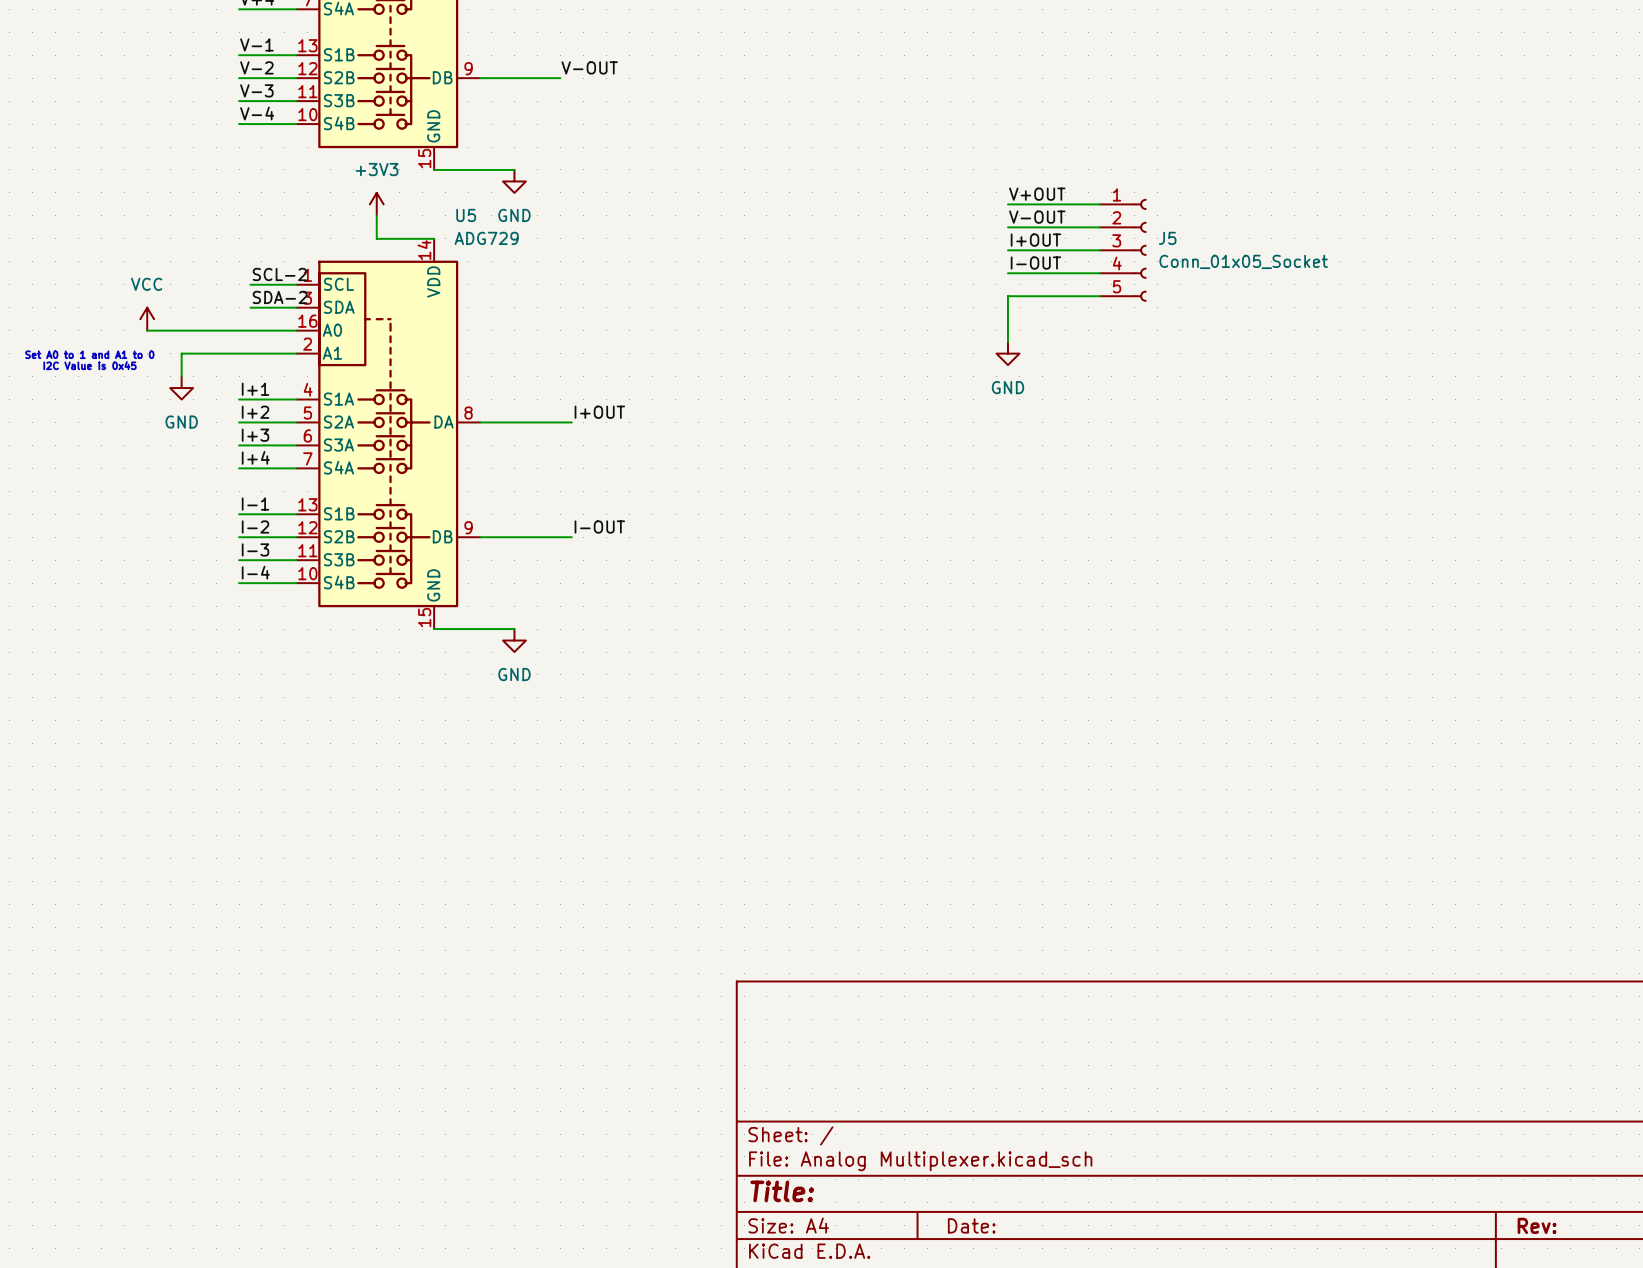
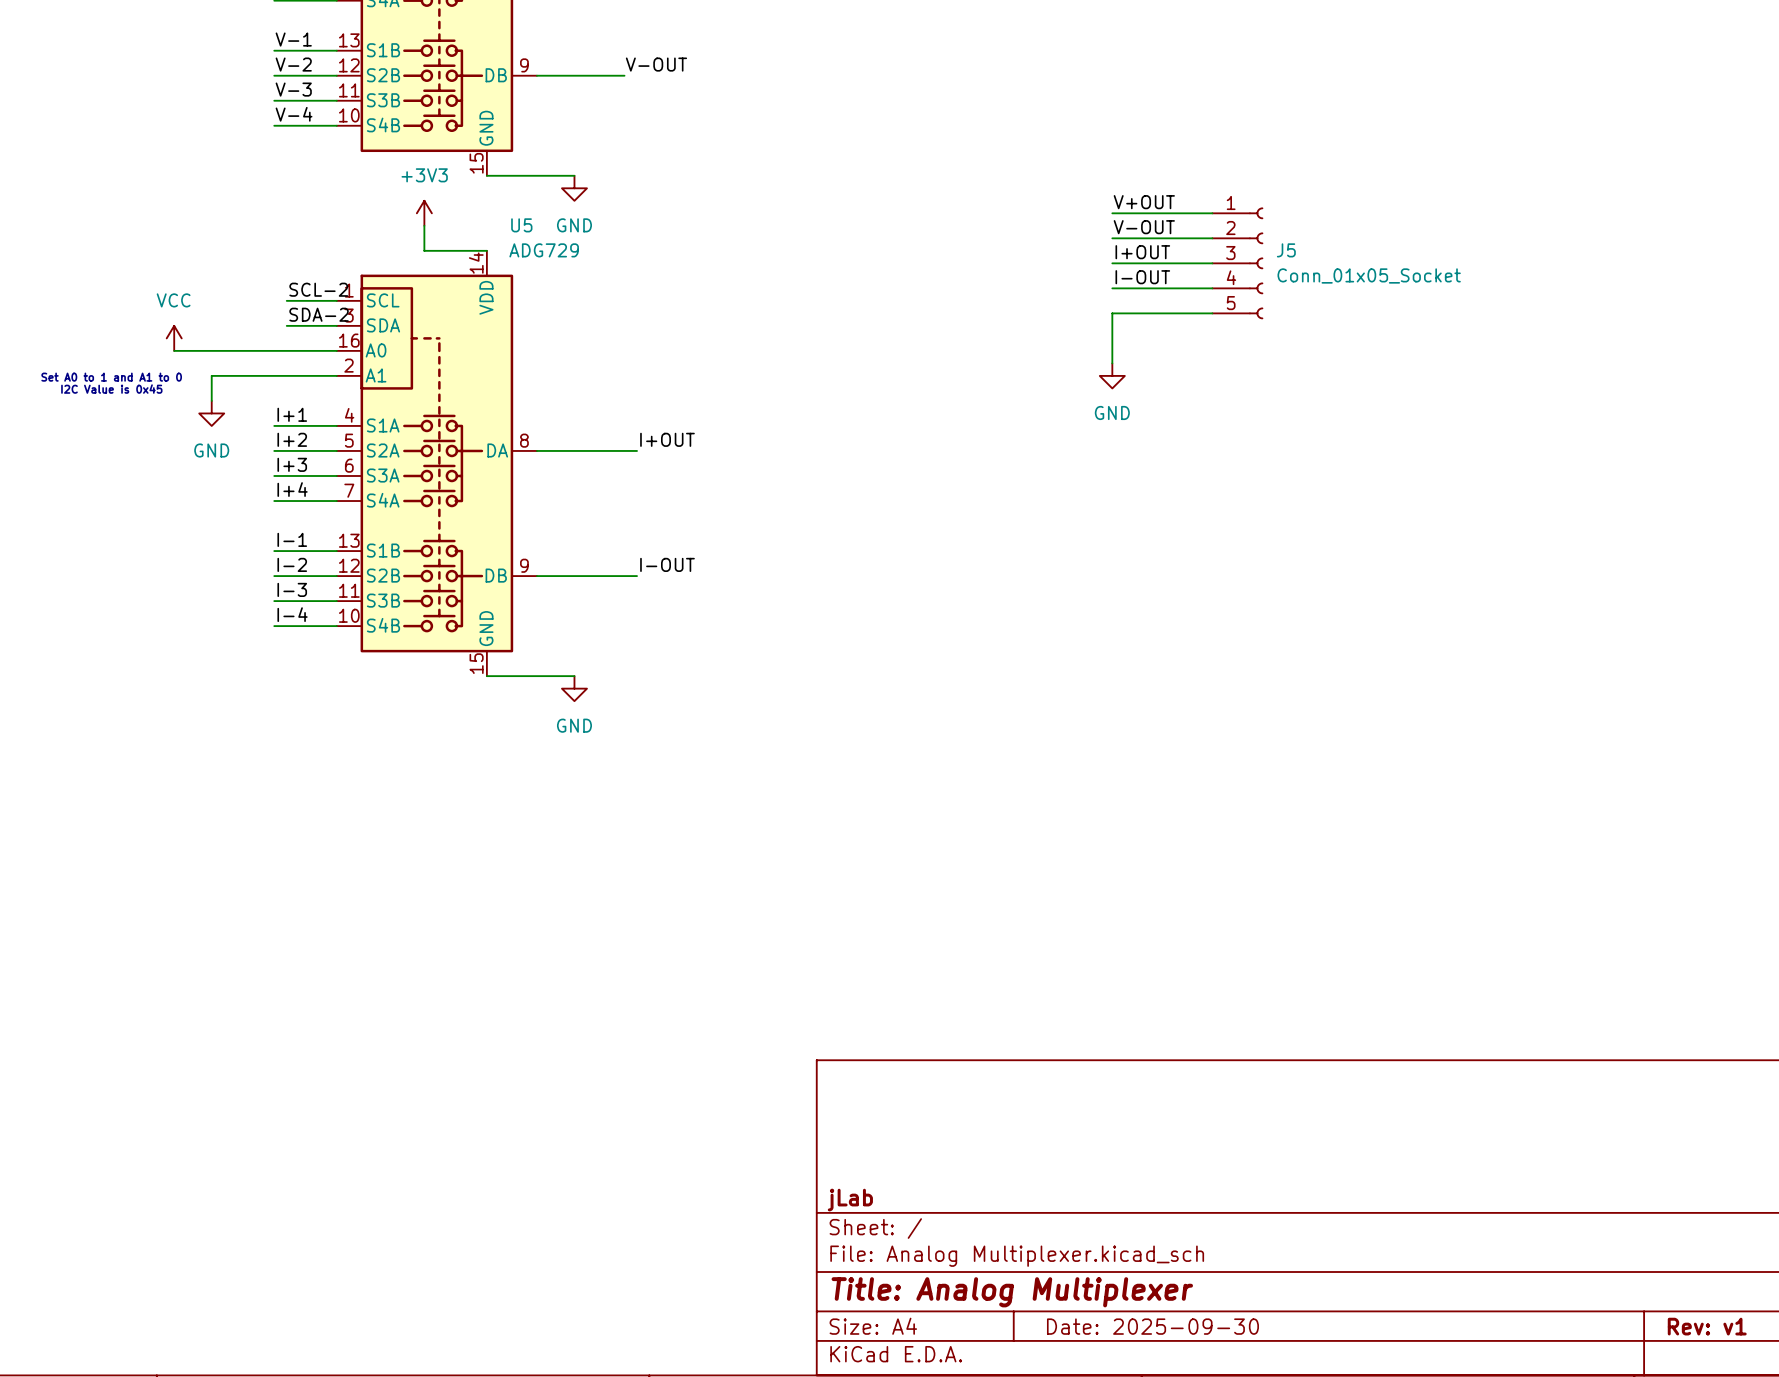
title block: none -> jLab (850, 1200)
title block: Title: (782, 1191) -> Title: Analog Multiplexer (1012, 1292)
title block: Date: (971, 1225) -> Date: 2025-09-30 (1152, 1326)
title block: Rev: (1537, 1225) -> Rev: v1 (1707, 1326)

